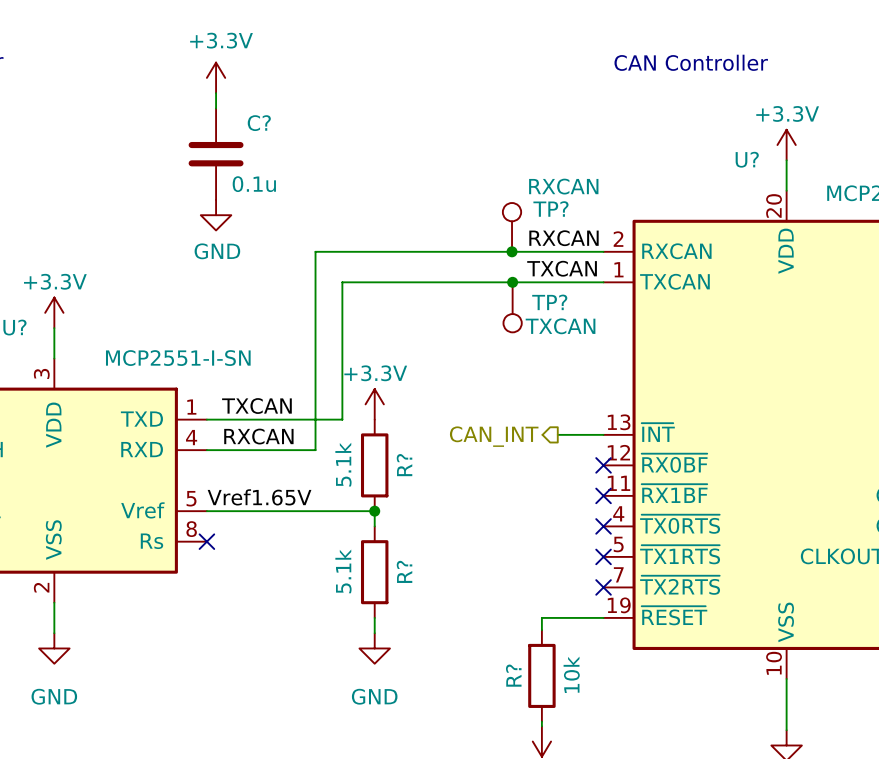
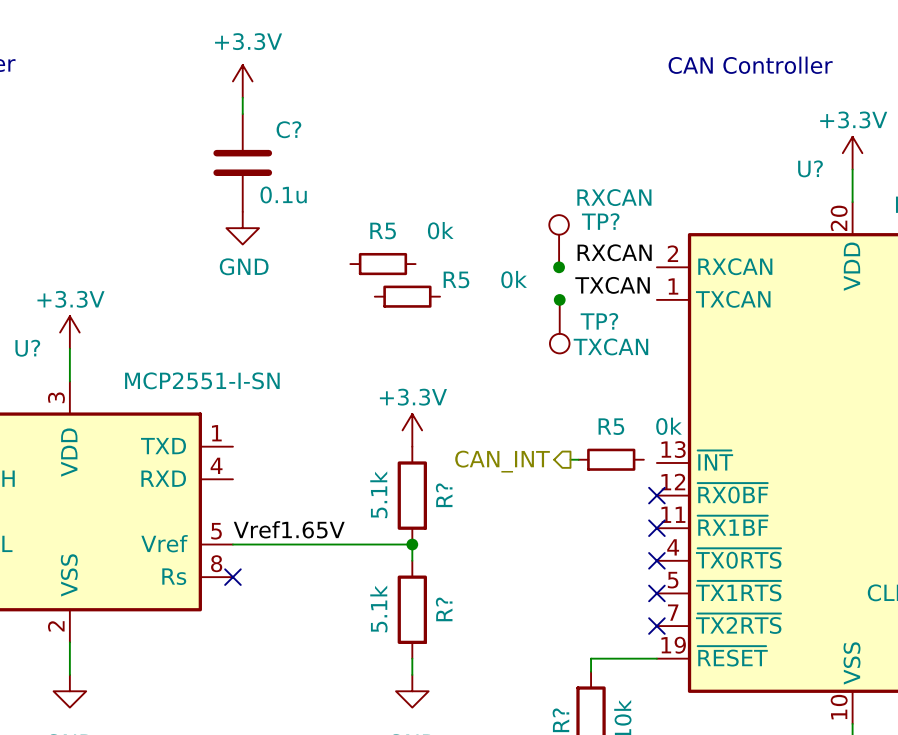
R5: none -> 0k (382, 264)
wire: (603, 251) (315, 251) (315, 450) (206, 450) -> none
R5: none -> 0k (407, 296)
wire: (603, 282) (342, 282) (342, 419) (206, 419) -> none
label: TXCAN (256, 406) -> none
wire: none -> (570, 459) (578, 459)
R5: none -> 0k (611, 459)
wire: (557, 434) (603, 434) -> none
label: RXCAN (258, 436) -> none
hierarchical label position: CAN_INT (494, 436) -> CAN_INT (502, 461)

